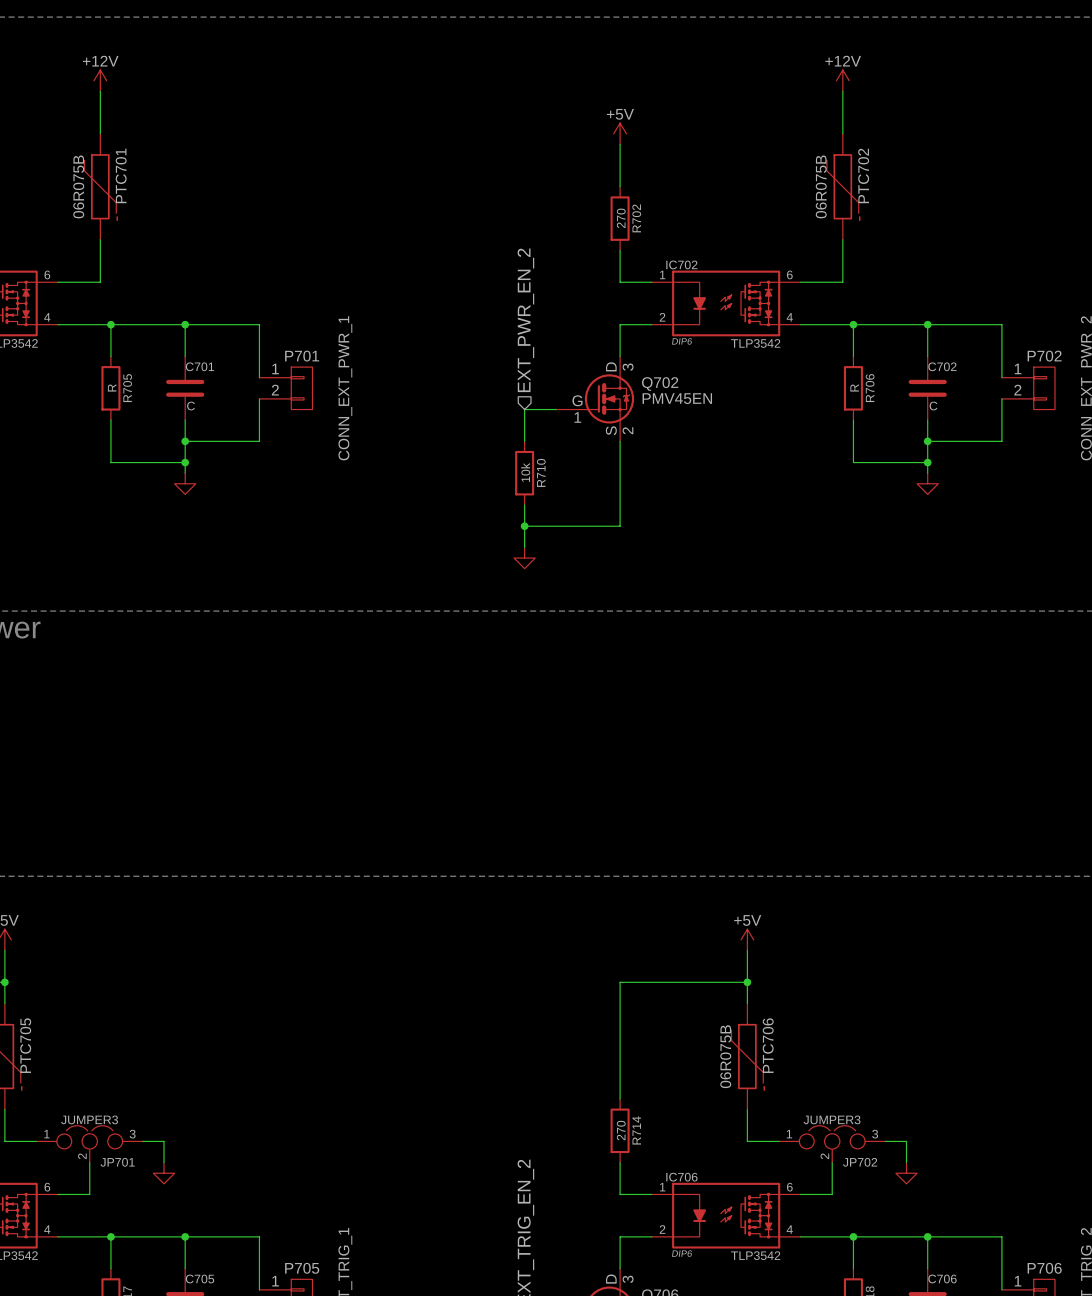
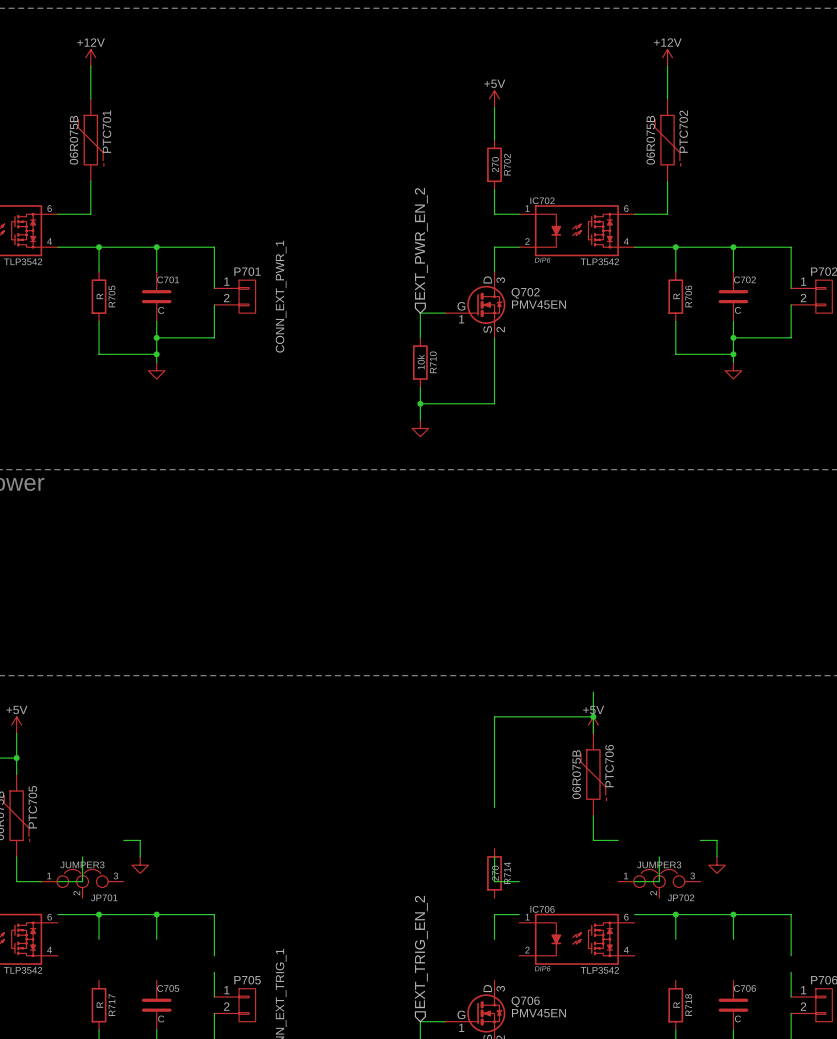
junction: none -> (593, 716)
wire: (747, 950) (747, 1003) -> (593, 733) (593, 692)
wire: (620, 982) (747, 982) -> (494, 758) (494, 716) (593, 716)
junction: (747, 982) -> none
wire: (620, 1045) (620, 1098) -> none
PTC706 position: (747, 1056) -> (593, 774)
wire: none -> (494, 856) (494, 881) (519, 881)
wire: (747, 1109) (747, 1141) (779, 1141) -> (593, 815) (593, 840) (618, 840)
wire: (142, 1141) (163, 1141) (163, 1162) -> (123, 840) (140, 840) (140, 856)
wire: (885, 1141) (906, 1141) (906, 1162) -> (700, 840) (716, 840) (716, 856)
wire: (89, 1162) (89, 1194) (57, 1194) -> (82, 856) (82, 881) (57, 881)
wire: (620, 1162) (620, 1183) -> (519, 914) (494, 914)
wire: (832, 1162) (832, 1194) (800, 1194) -> (659, 856) (659, 881) (634, 881)
power symbol position: (163, 1173) -> (140, 865)
power symbol position: (906, 1173) -> (716, 865)
wire: none -> (57, 914) (214, 914) (214, 955)
junction: none -> (99, 914)
junction: none -> (156, 914)
wire: none -> (634, 914) (791, 914) (791, 955)
junction: none -> (675, 914)
junction: none -> (733, 914)
wire: (620, 1194) (651, 1194) -> (494, 922) (494, 939)
wire: (57, 1236) (259, 1236) (259, 1258) -> none
wire: (110, 1236) (110, 1268) -> (99, 914) (99, 939)
junction: (110, 1236) -> none
wire: (185, 1236) (185, 1268) -> (156, 914) (156, 939)
junction: (185, 1236) -> none
wire: (651, 1236) (620, 1236) (620, 1268) -> none
wire: (800, 1236) (1001, 1236) (1001, 1258) -> none
wire: (853, 1236) (853, 1268) -> (675, 914) (675, 939)
junction: (853, 1236) -> none
wire: (927, 1236) (927, 1268) -> (733, 914) (733, 939)
junction: (927, 1236) -> none

